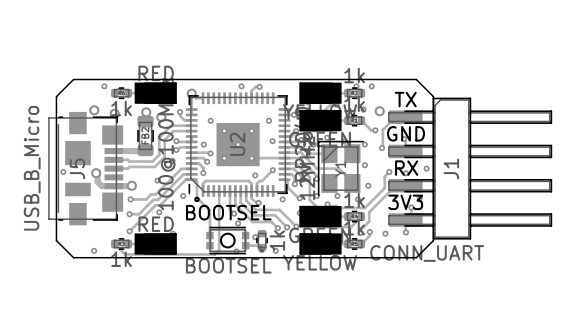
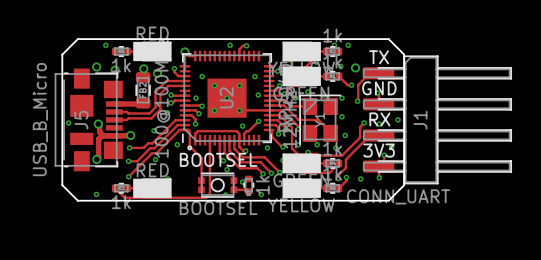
track: none -> (103, 135) (98, 139) (98, 157) (96, 159)
via: none -> (96, 159)

